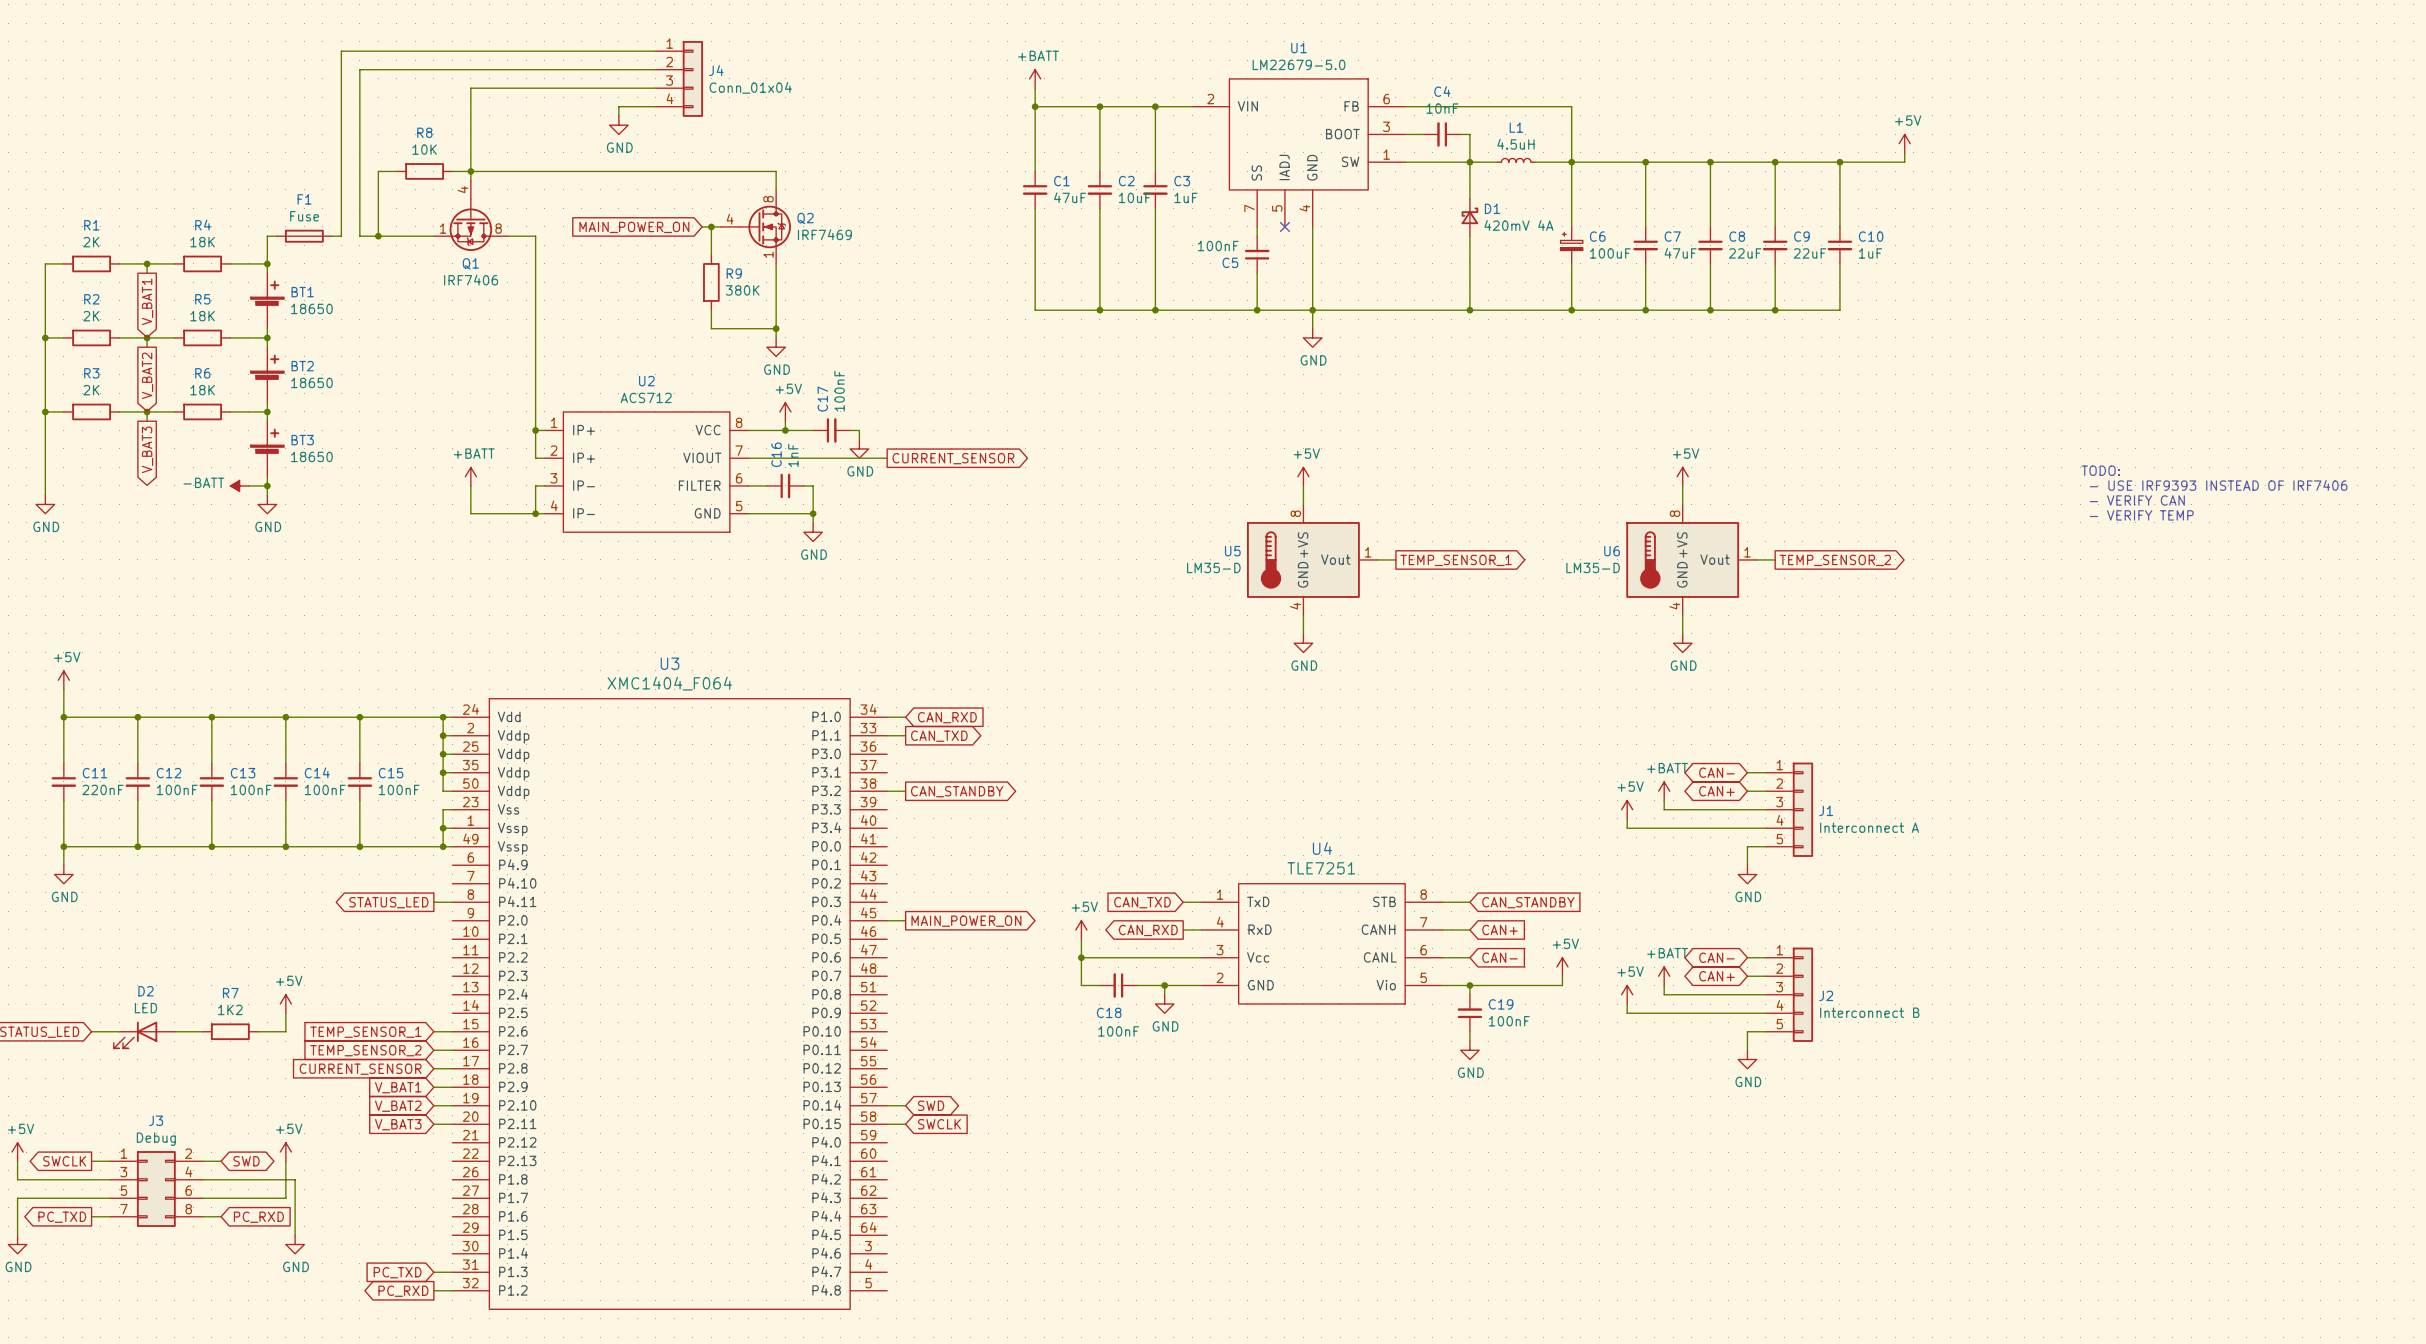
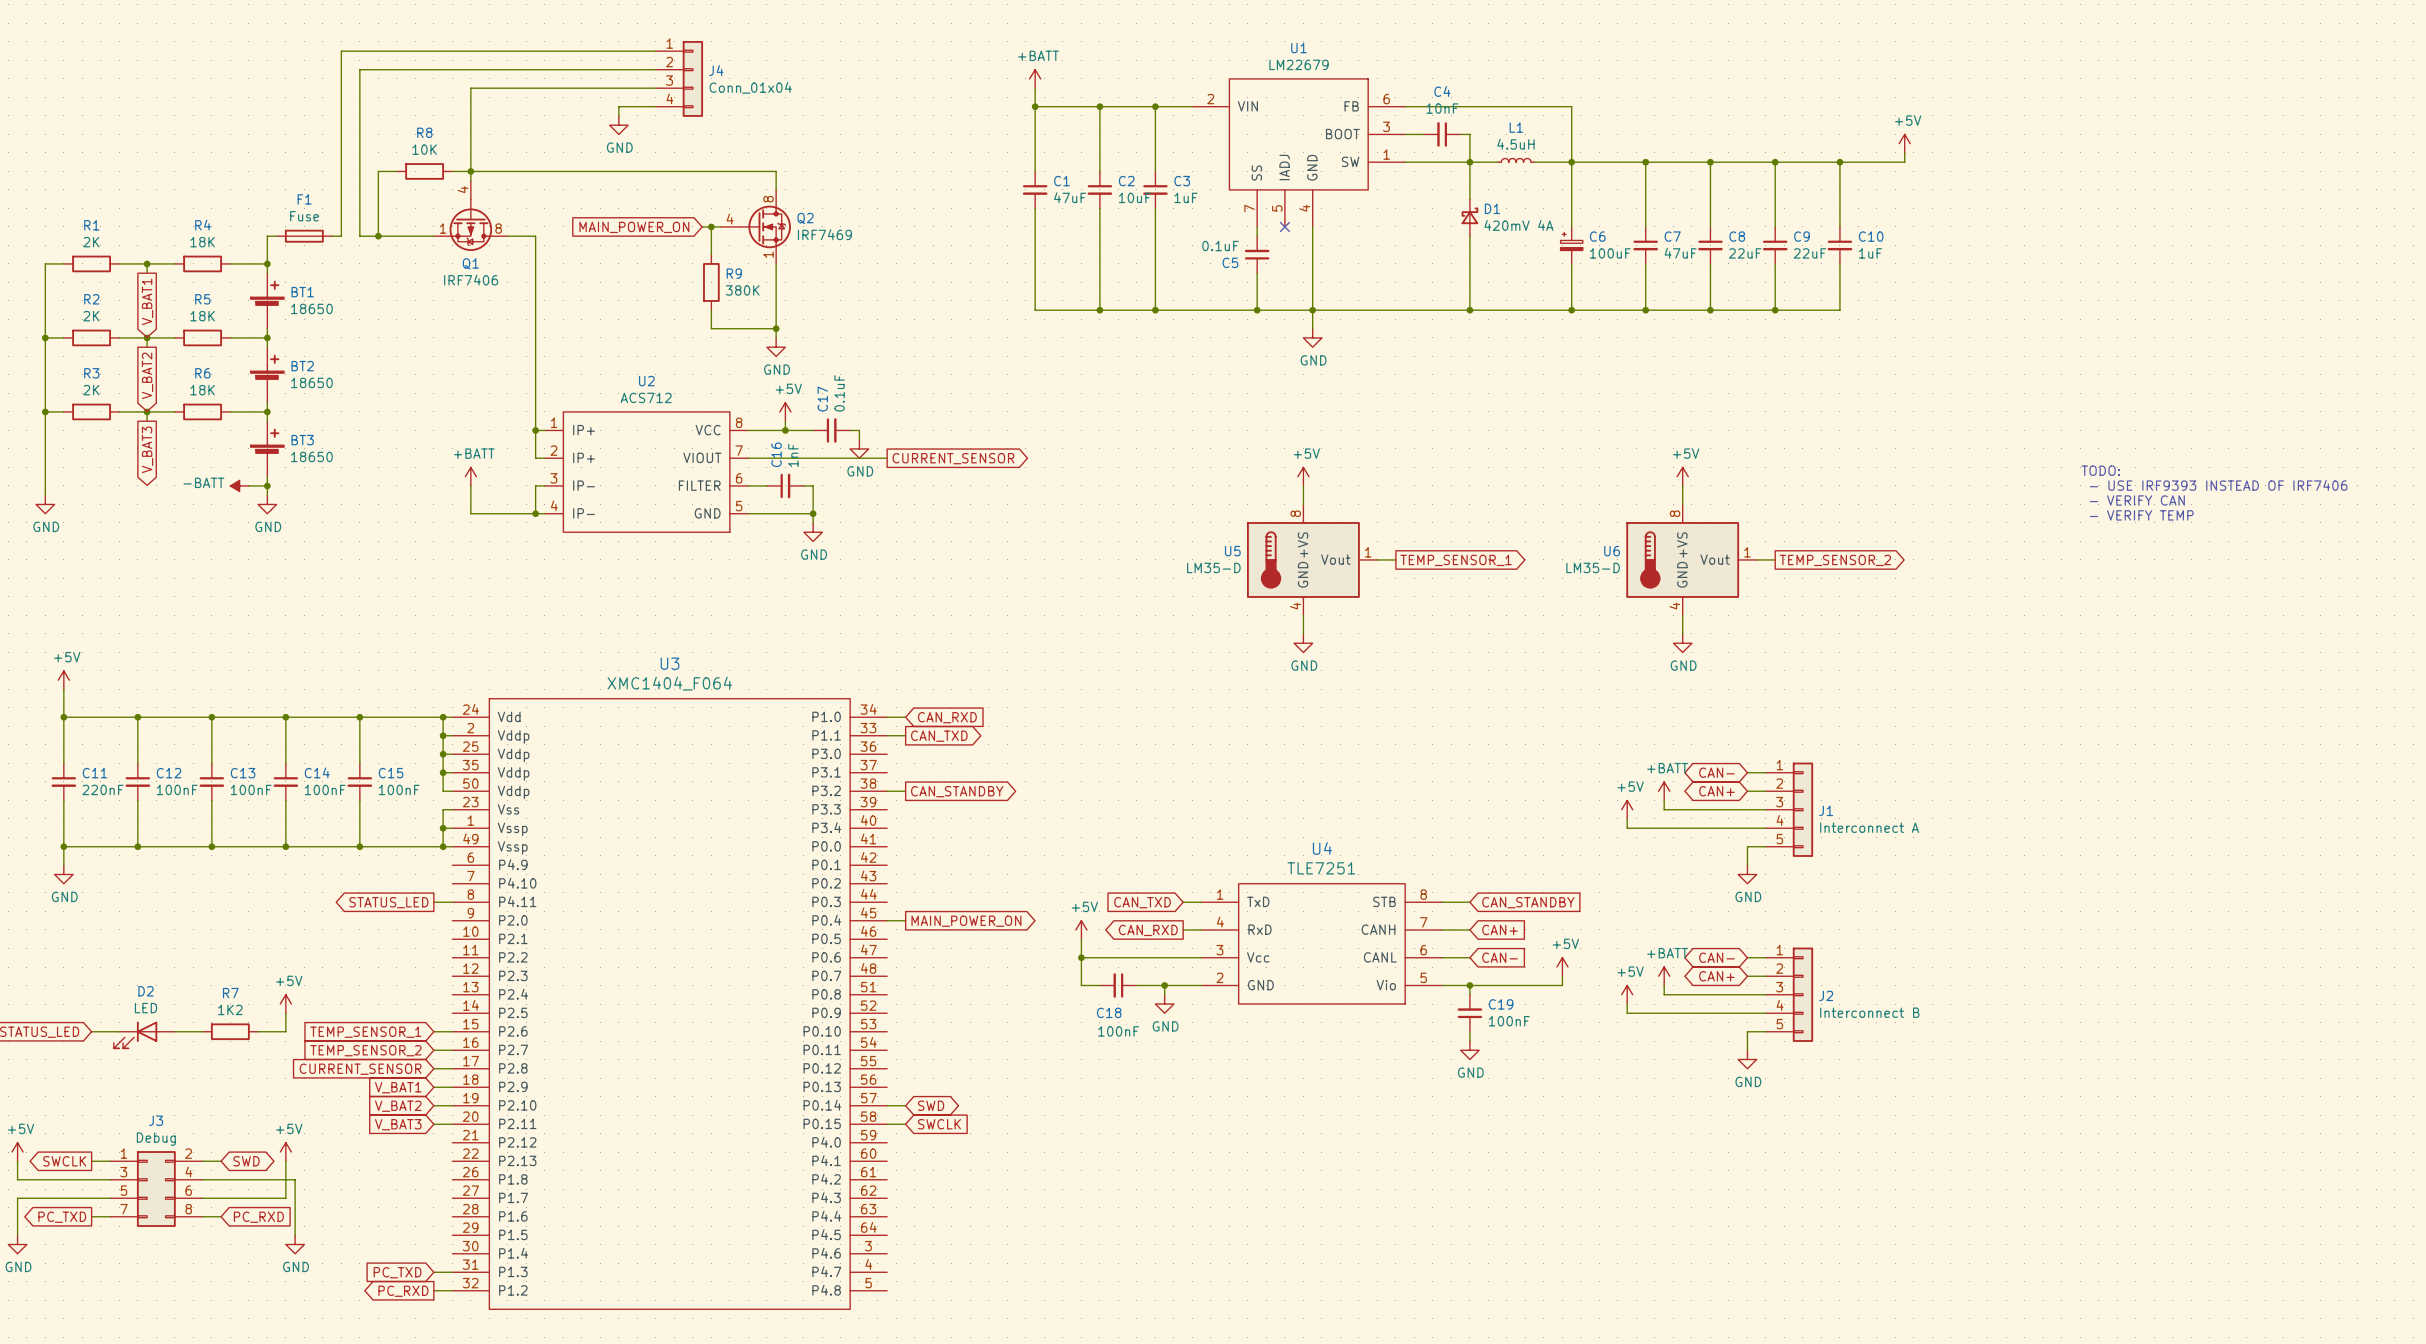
U1 value: LM22679-5.0 (1299, 64) -> LM22679 (1299, 64)
C5 value: 100nF (1218, 246) -> 0.1uF (1220, 246)
C17 value: 100nF (839, 391) -> 0.1uF (839, 393)

